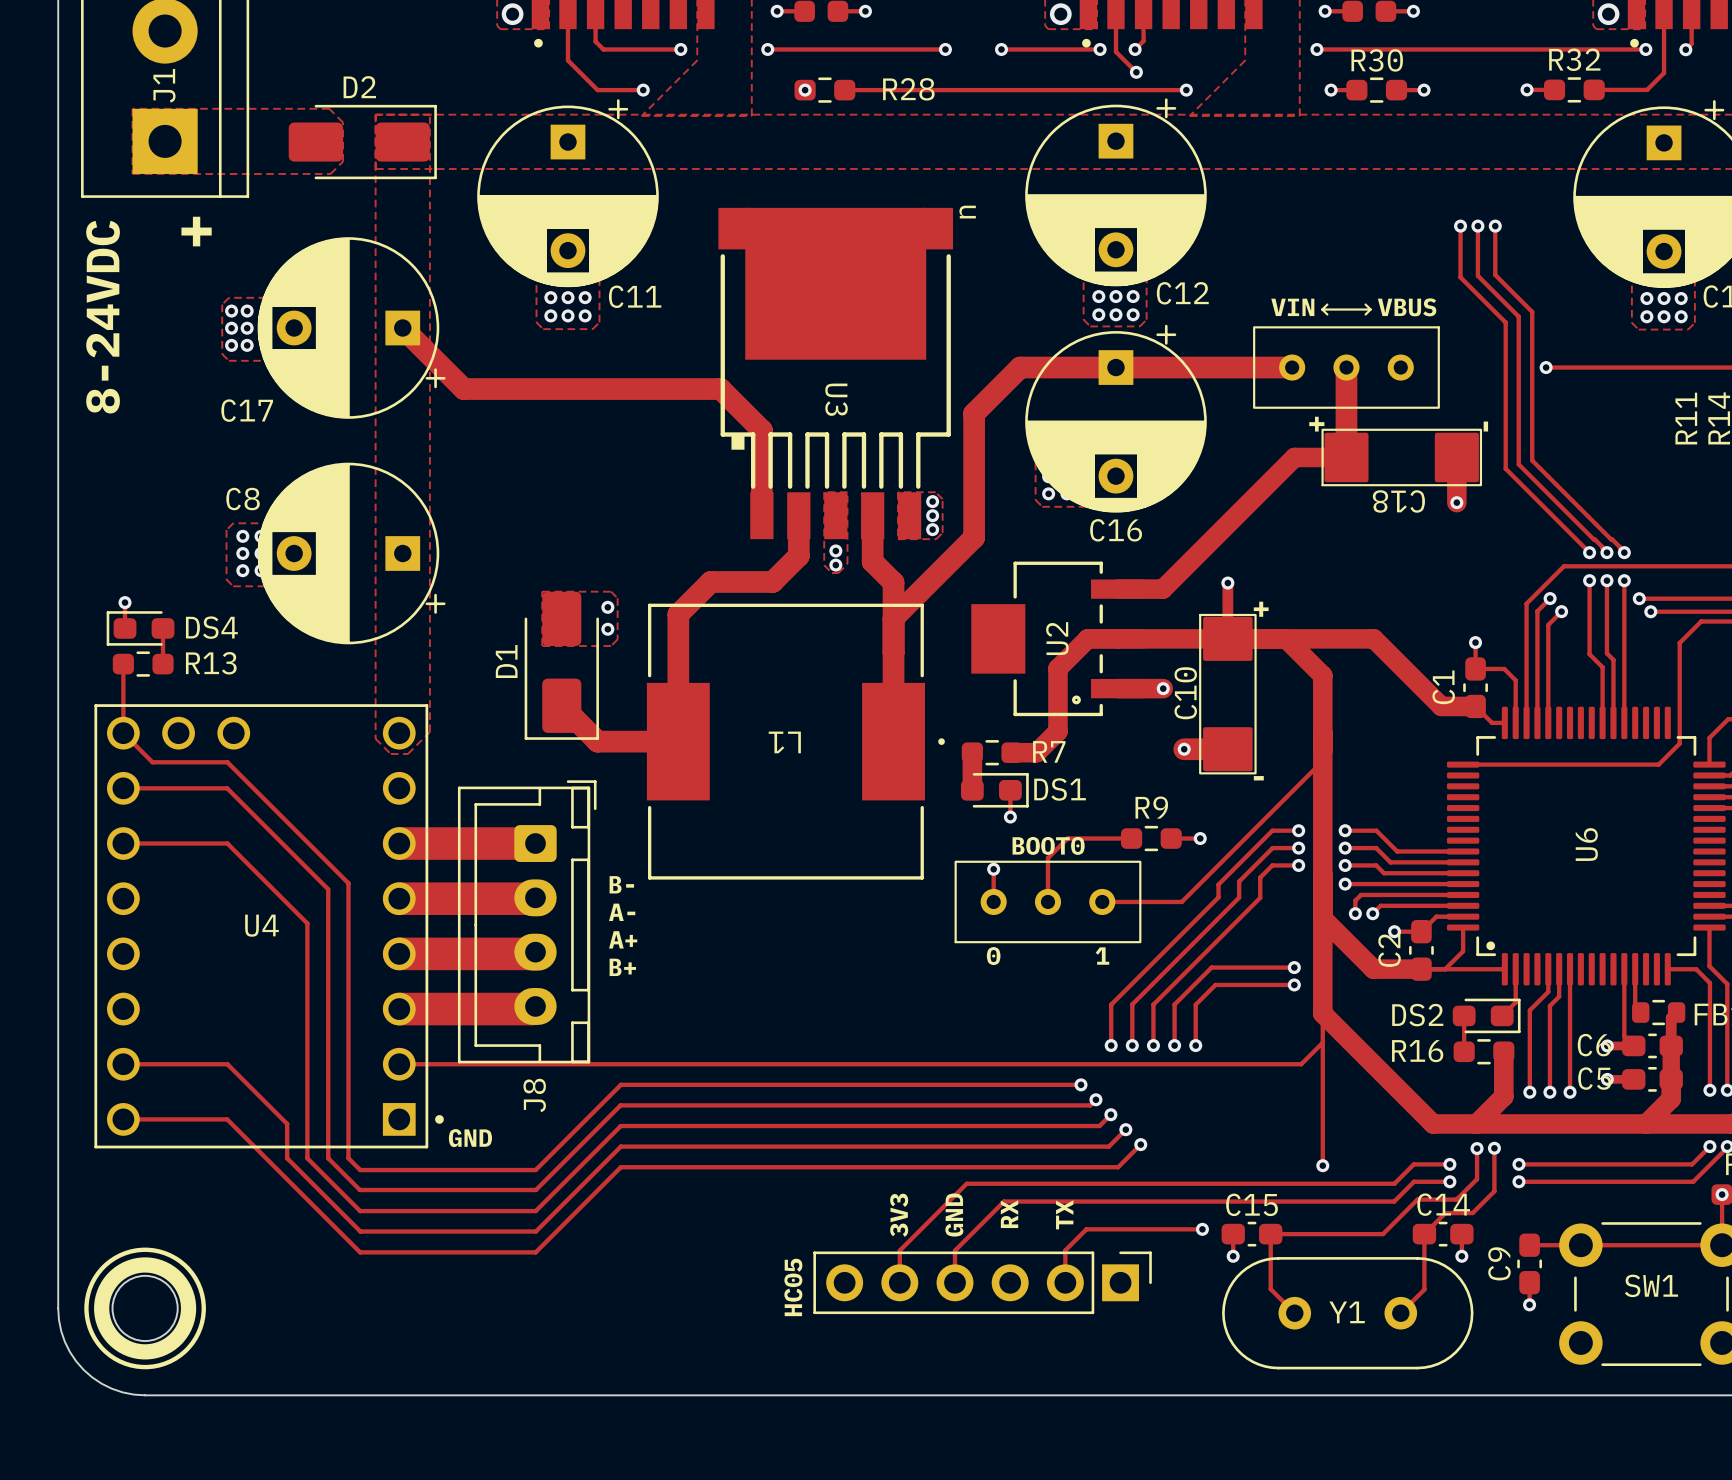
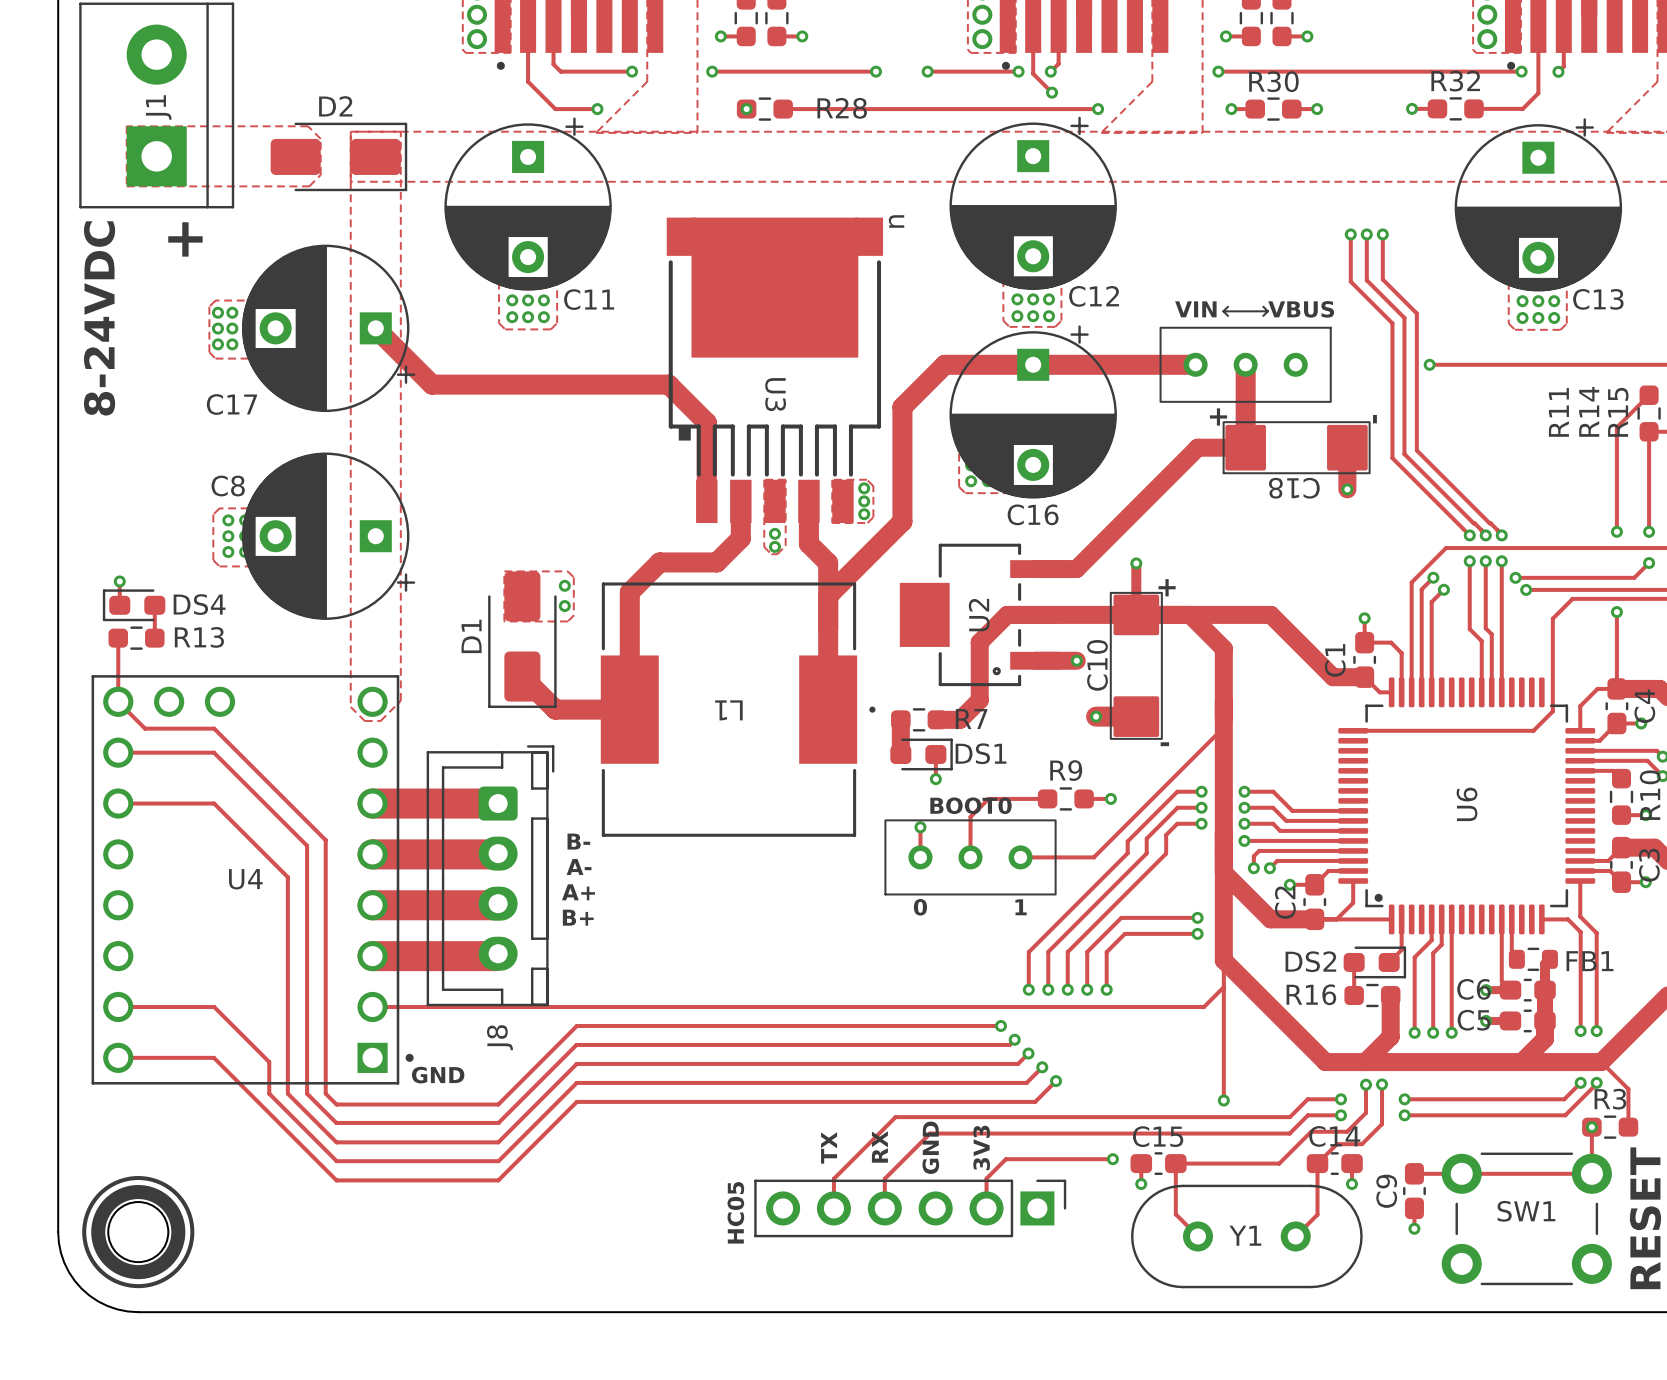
text: RX (1009, 1214) -> GND (930, 1147)
text: TX (1064, 1214) -> 3V3 (981, 1147)
text: 3V3 (899, 1215) -> TX (829, 1147)
text: GND (954, 1215) -> RX (879, 1146)

